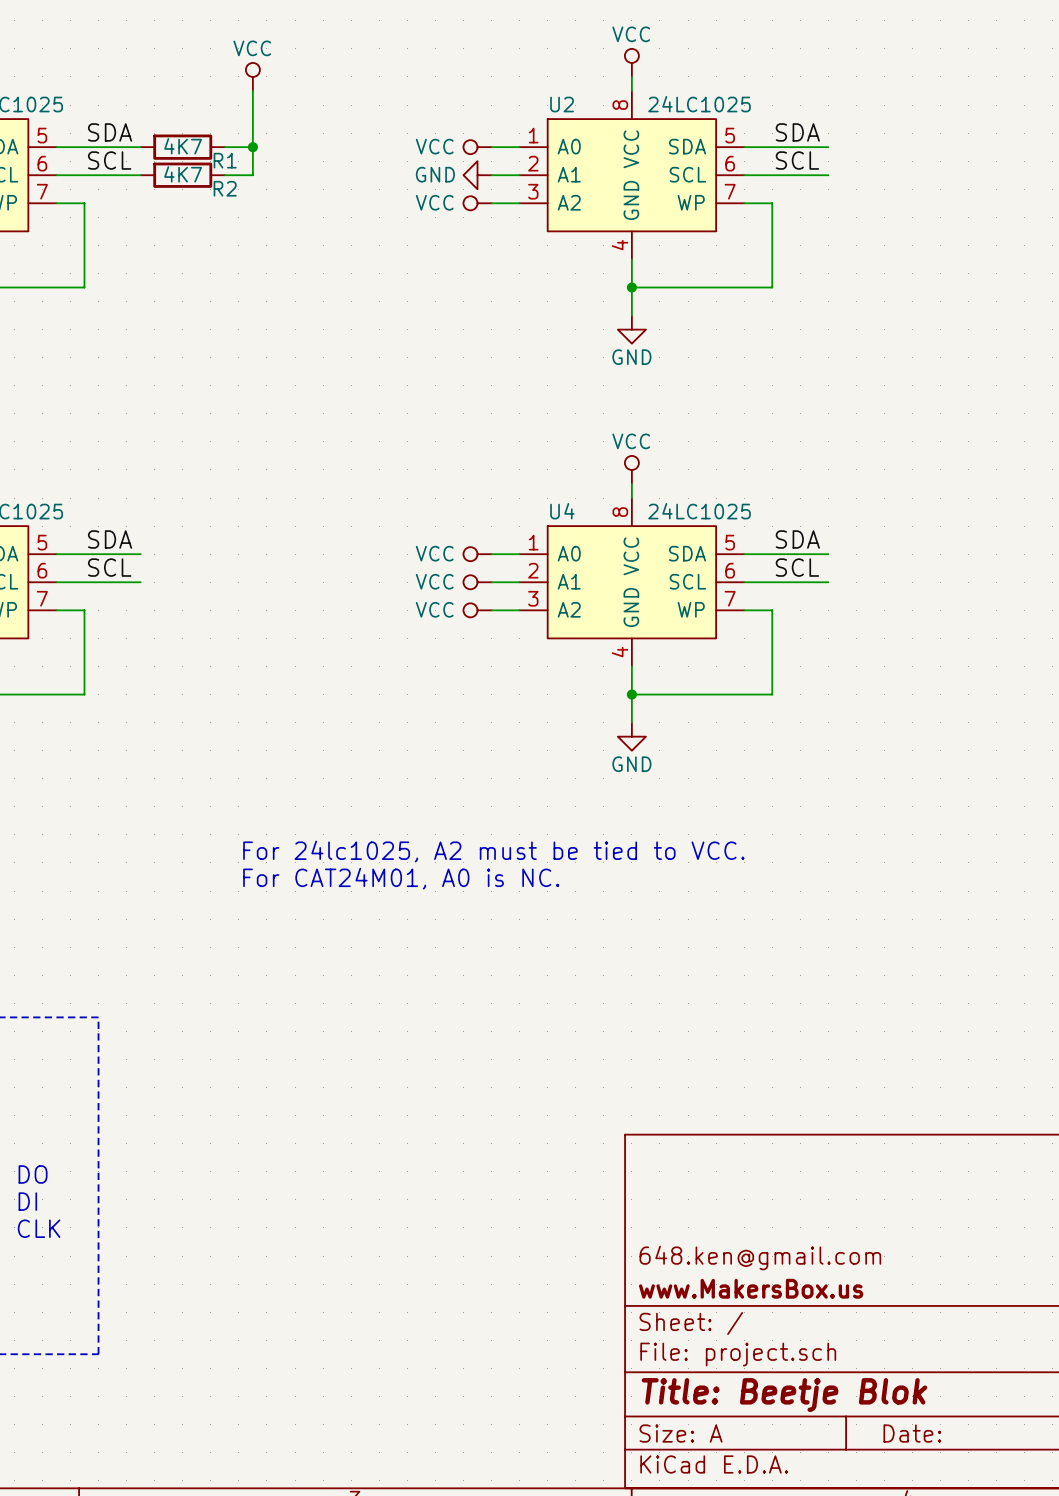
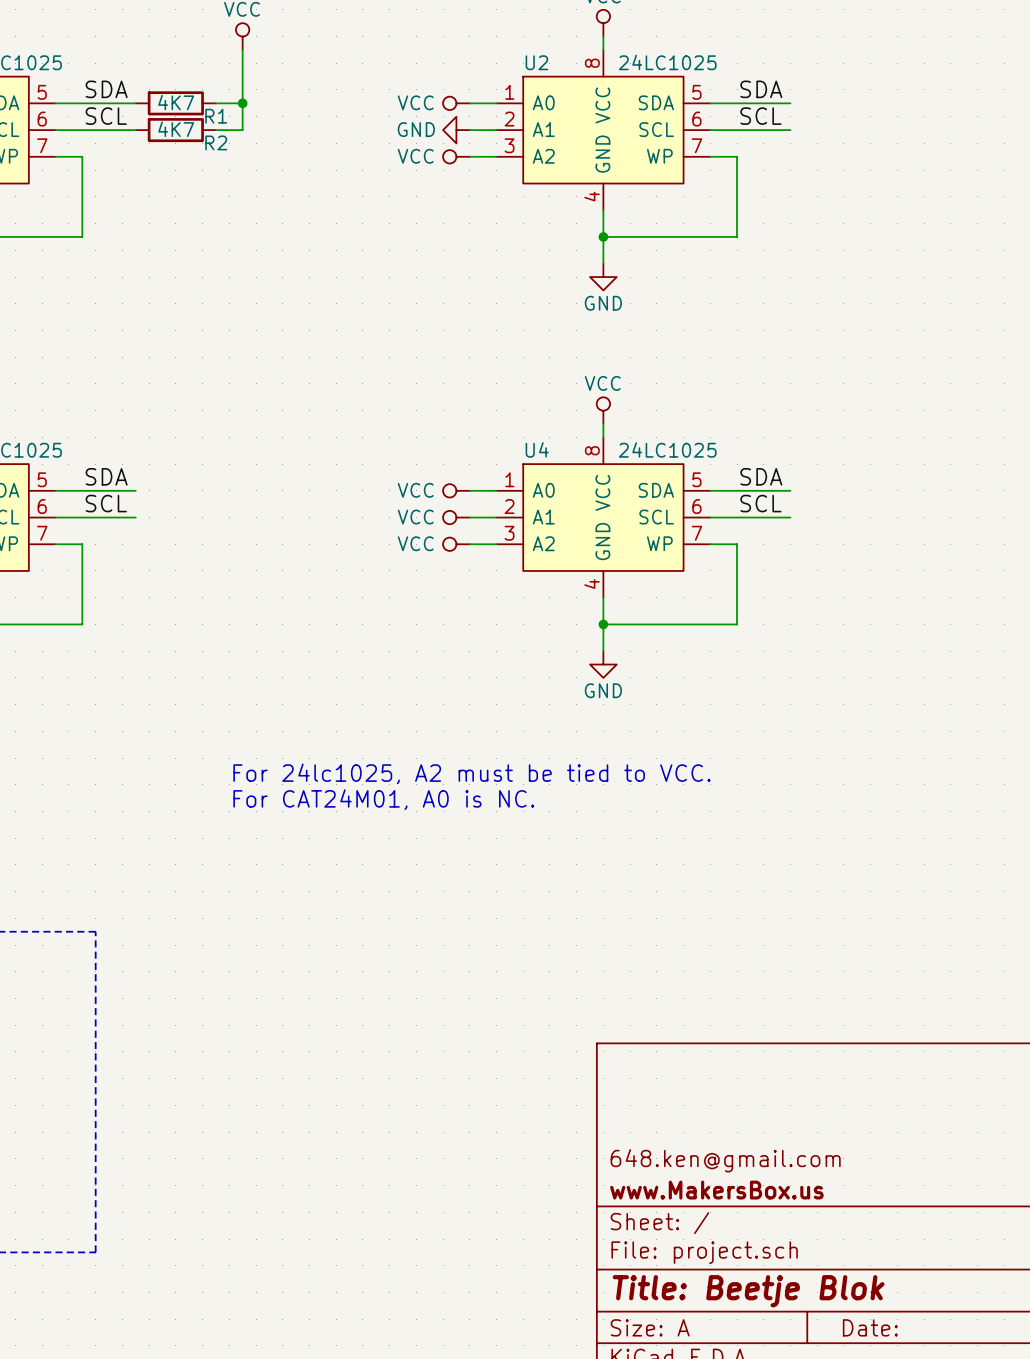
text: DO (33, 1174) -> none
text: DI (27, 1201) -> none
text: CLK (39, 1228) -> none

